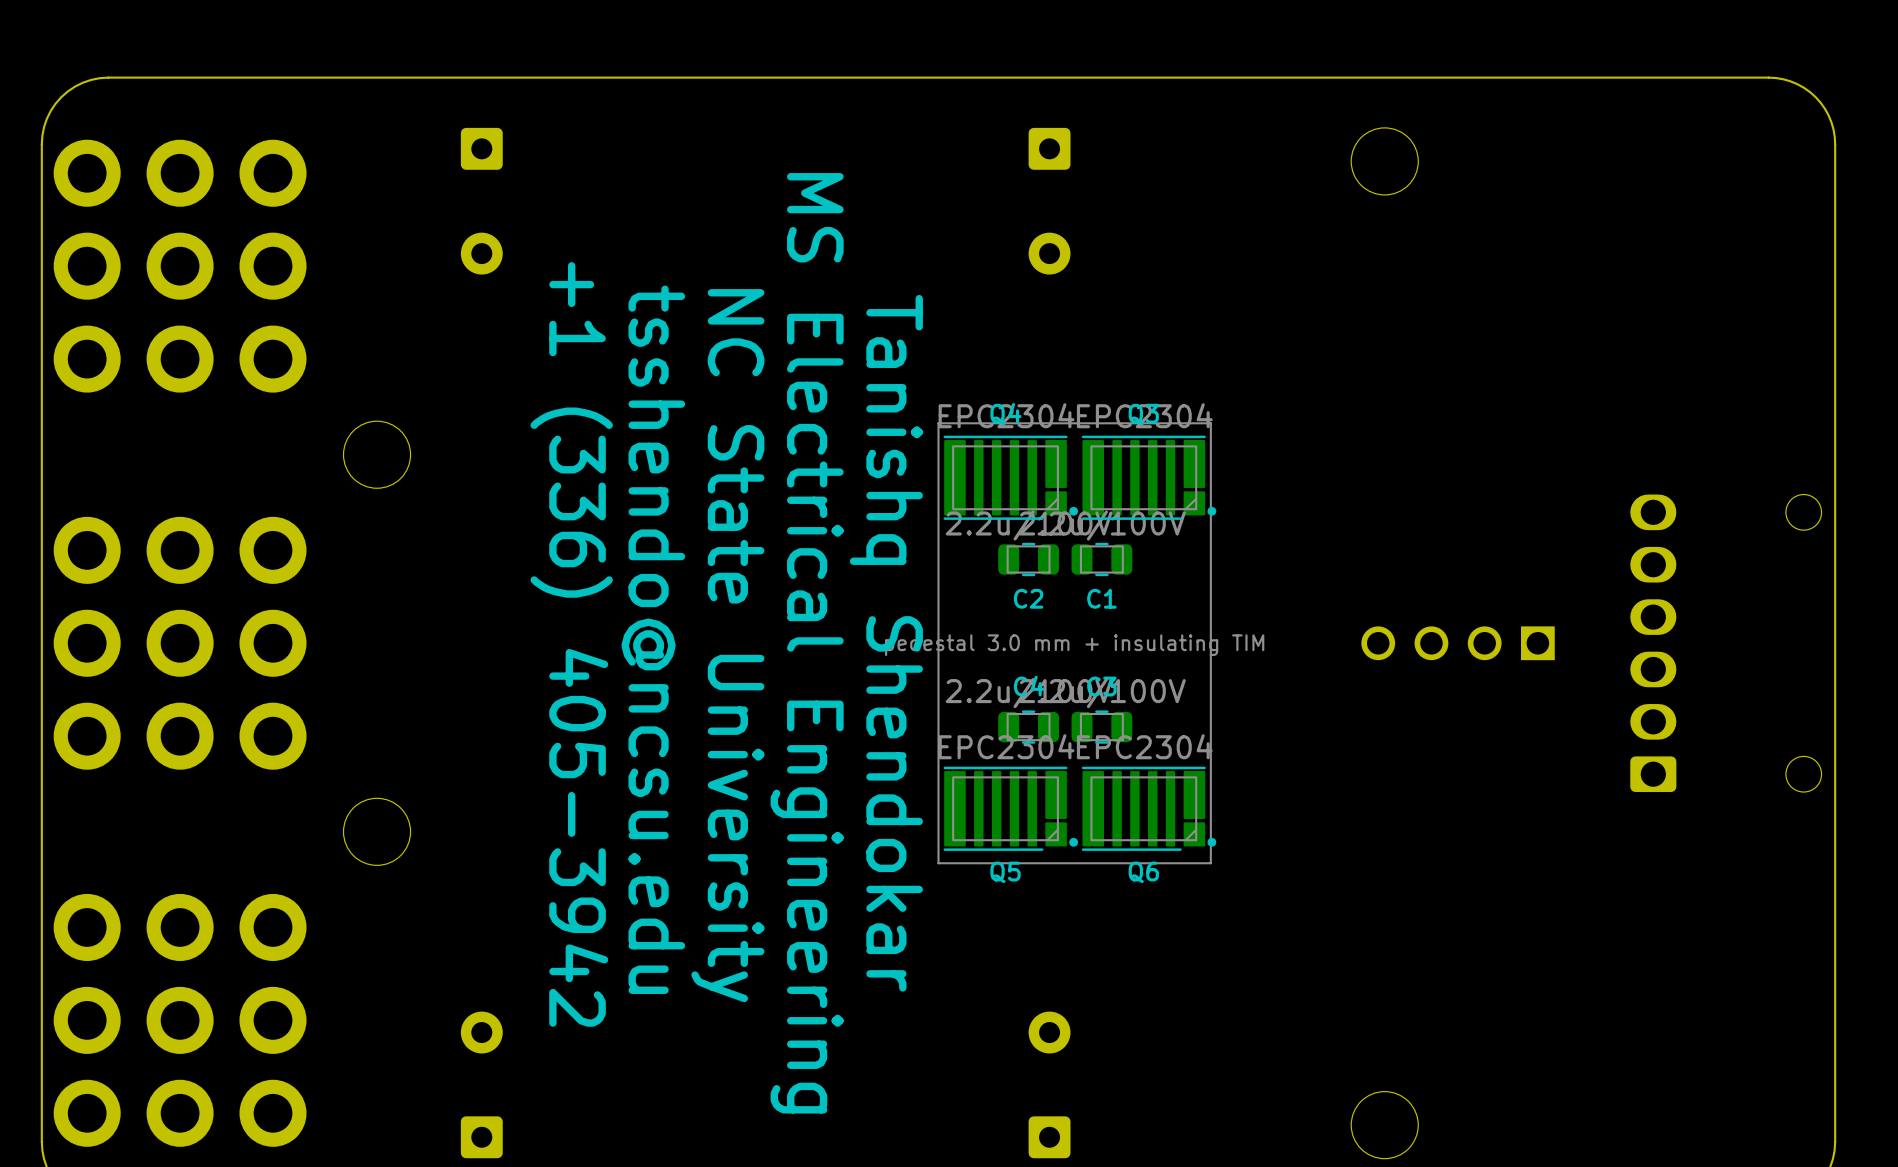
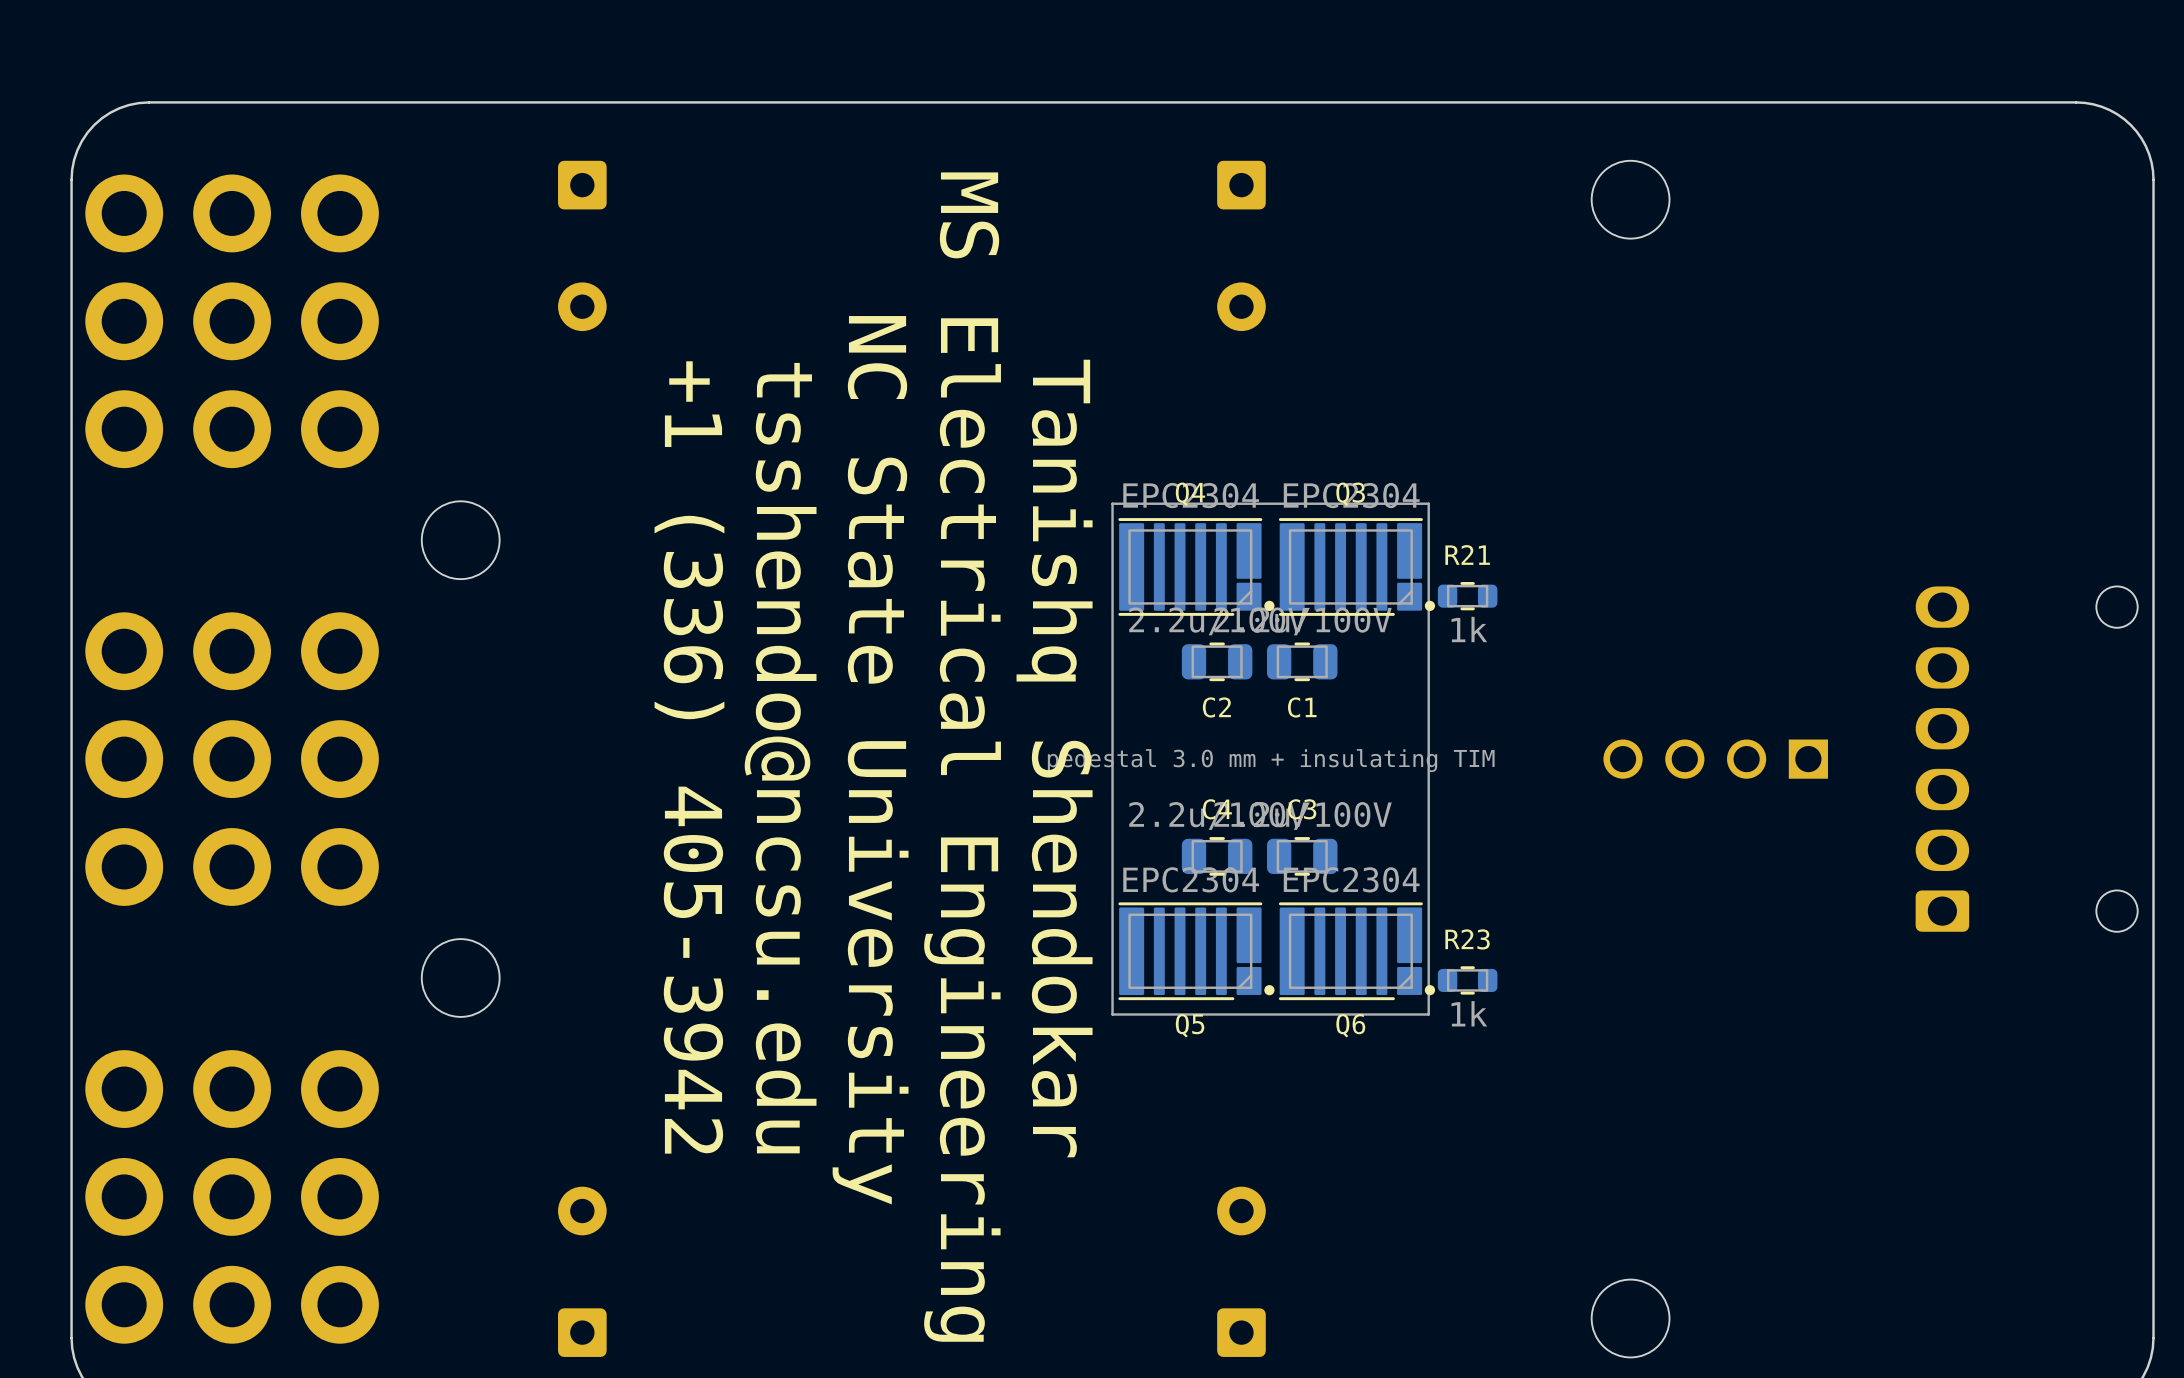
R21: none -> 1k (1467, 596)
R23: none -> 1k (1467, 980)

